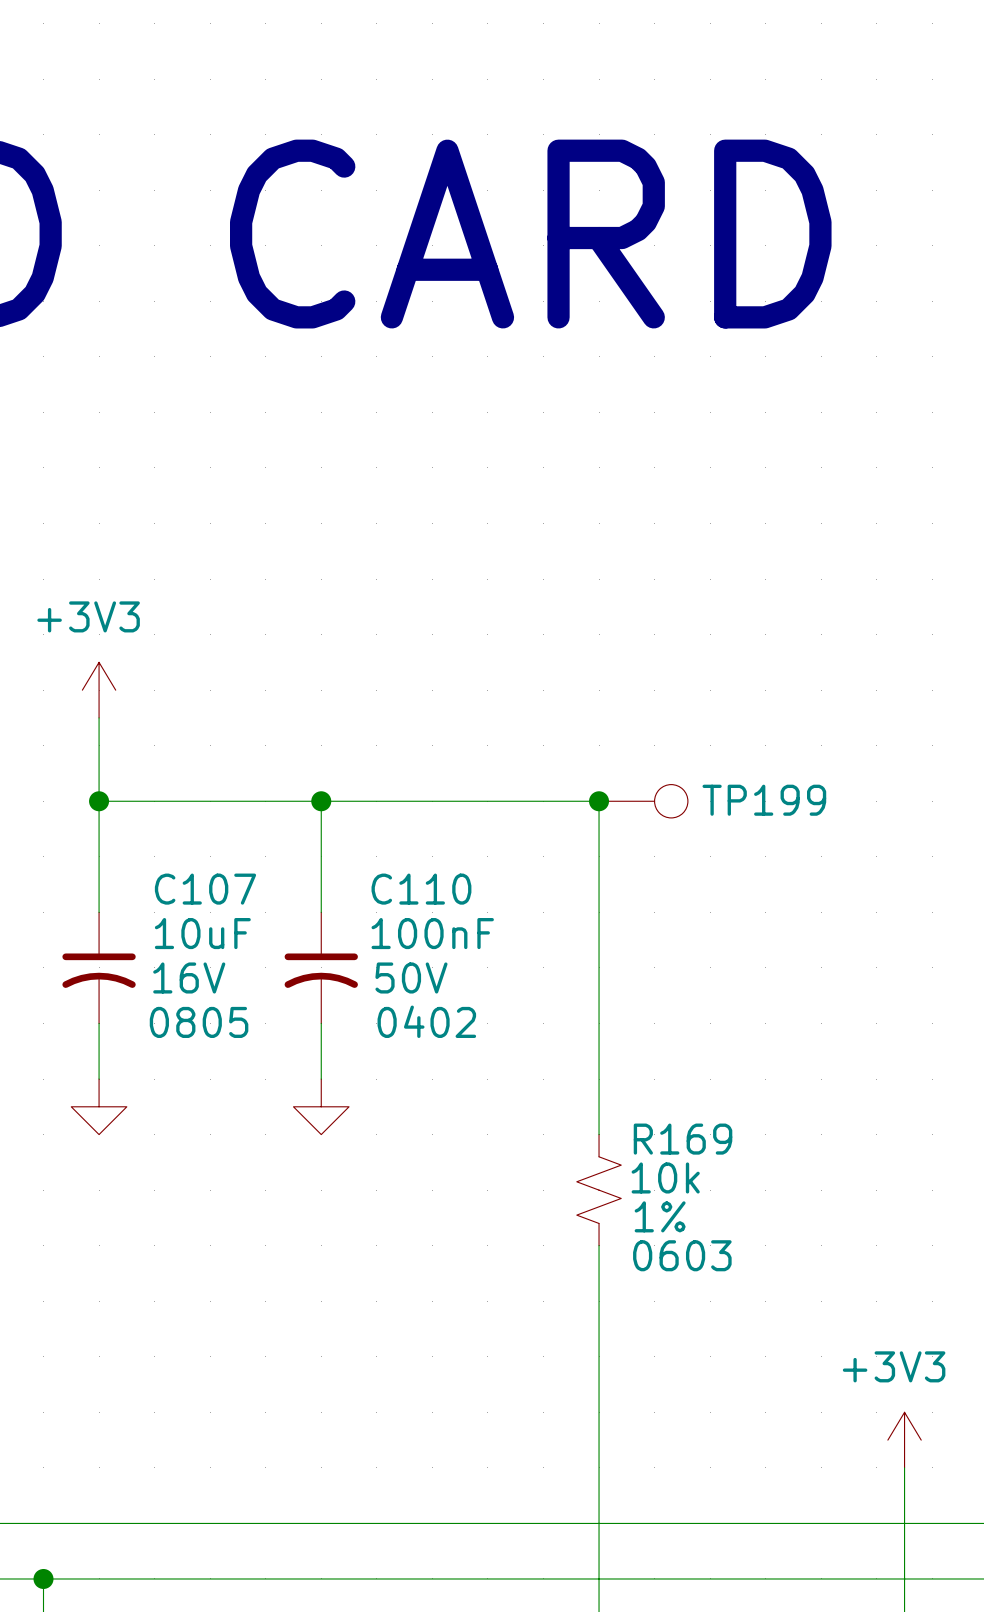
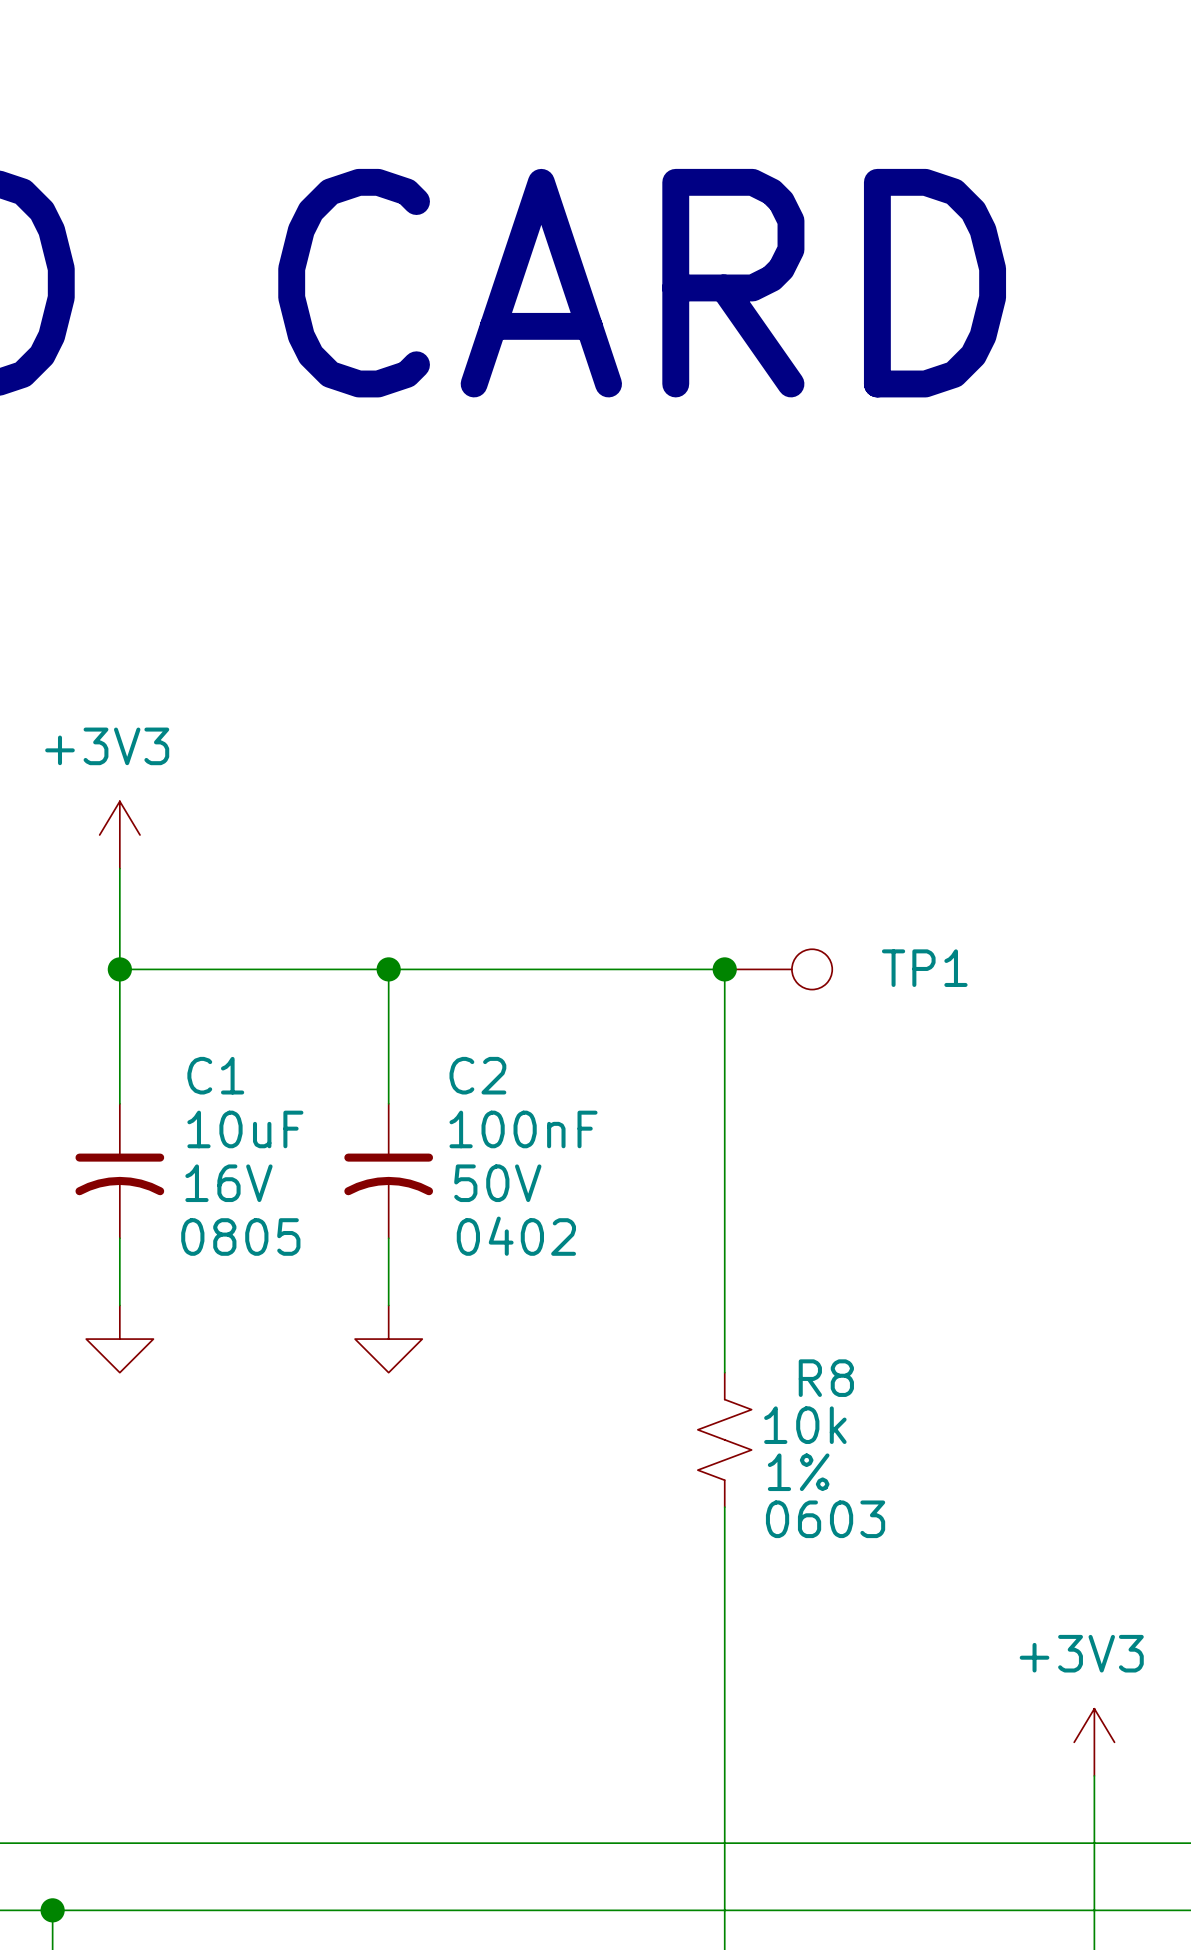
TP199 name: TP199 (764, 800) -> TP1 (924, 968)
C107 name: C107 (205, 889) -> C1 (215, 1075)
C110 name: C110 (421, 889) -> C2 (477, 1075)
R169 name: R169 (683, 1139) -> R8 (826, 1378)

